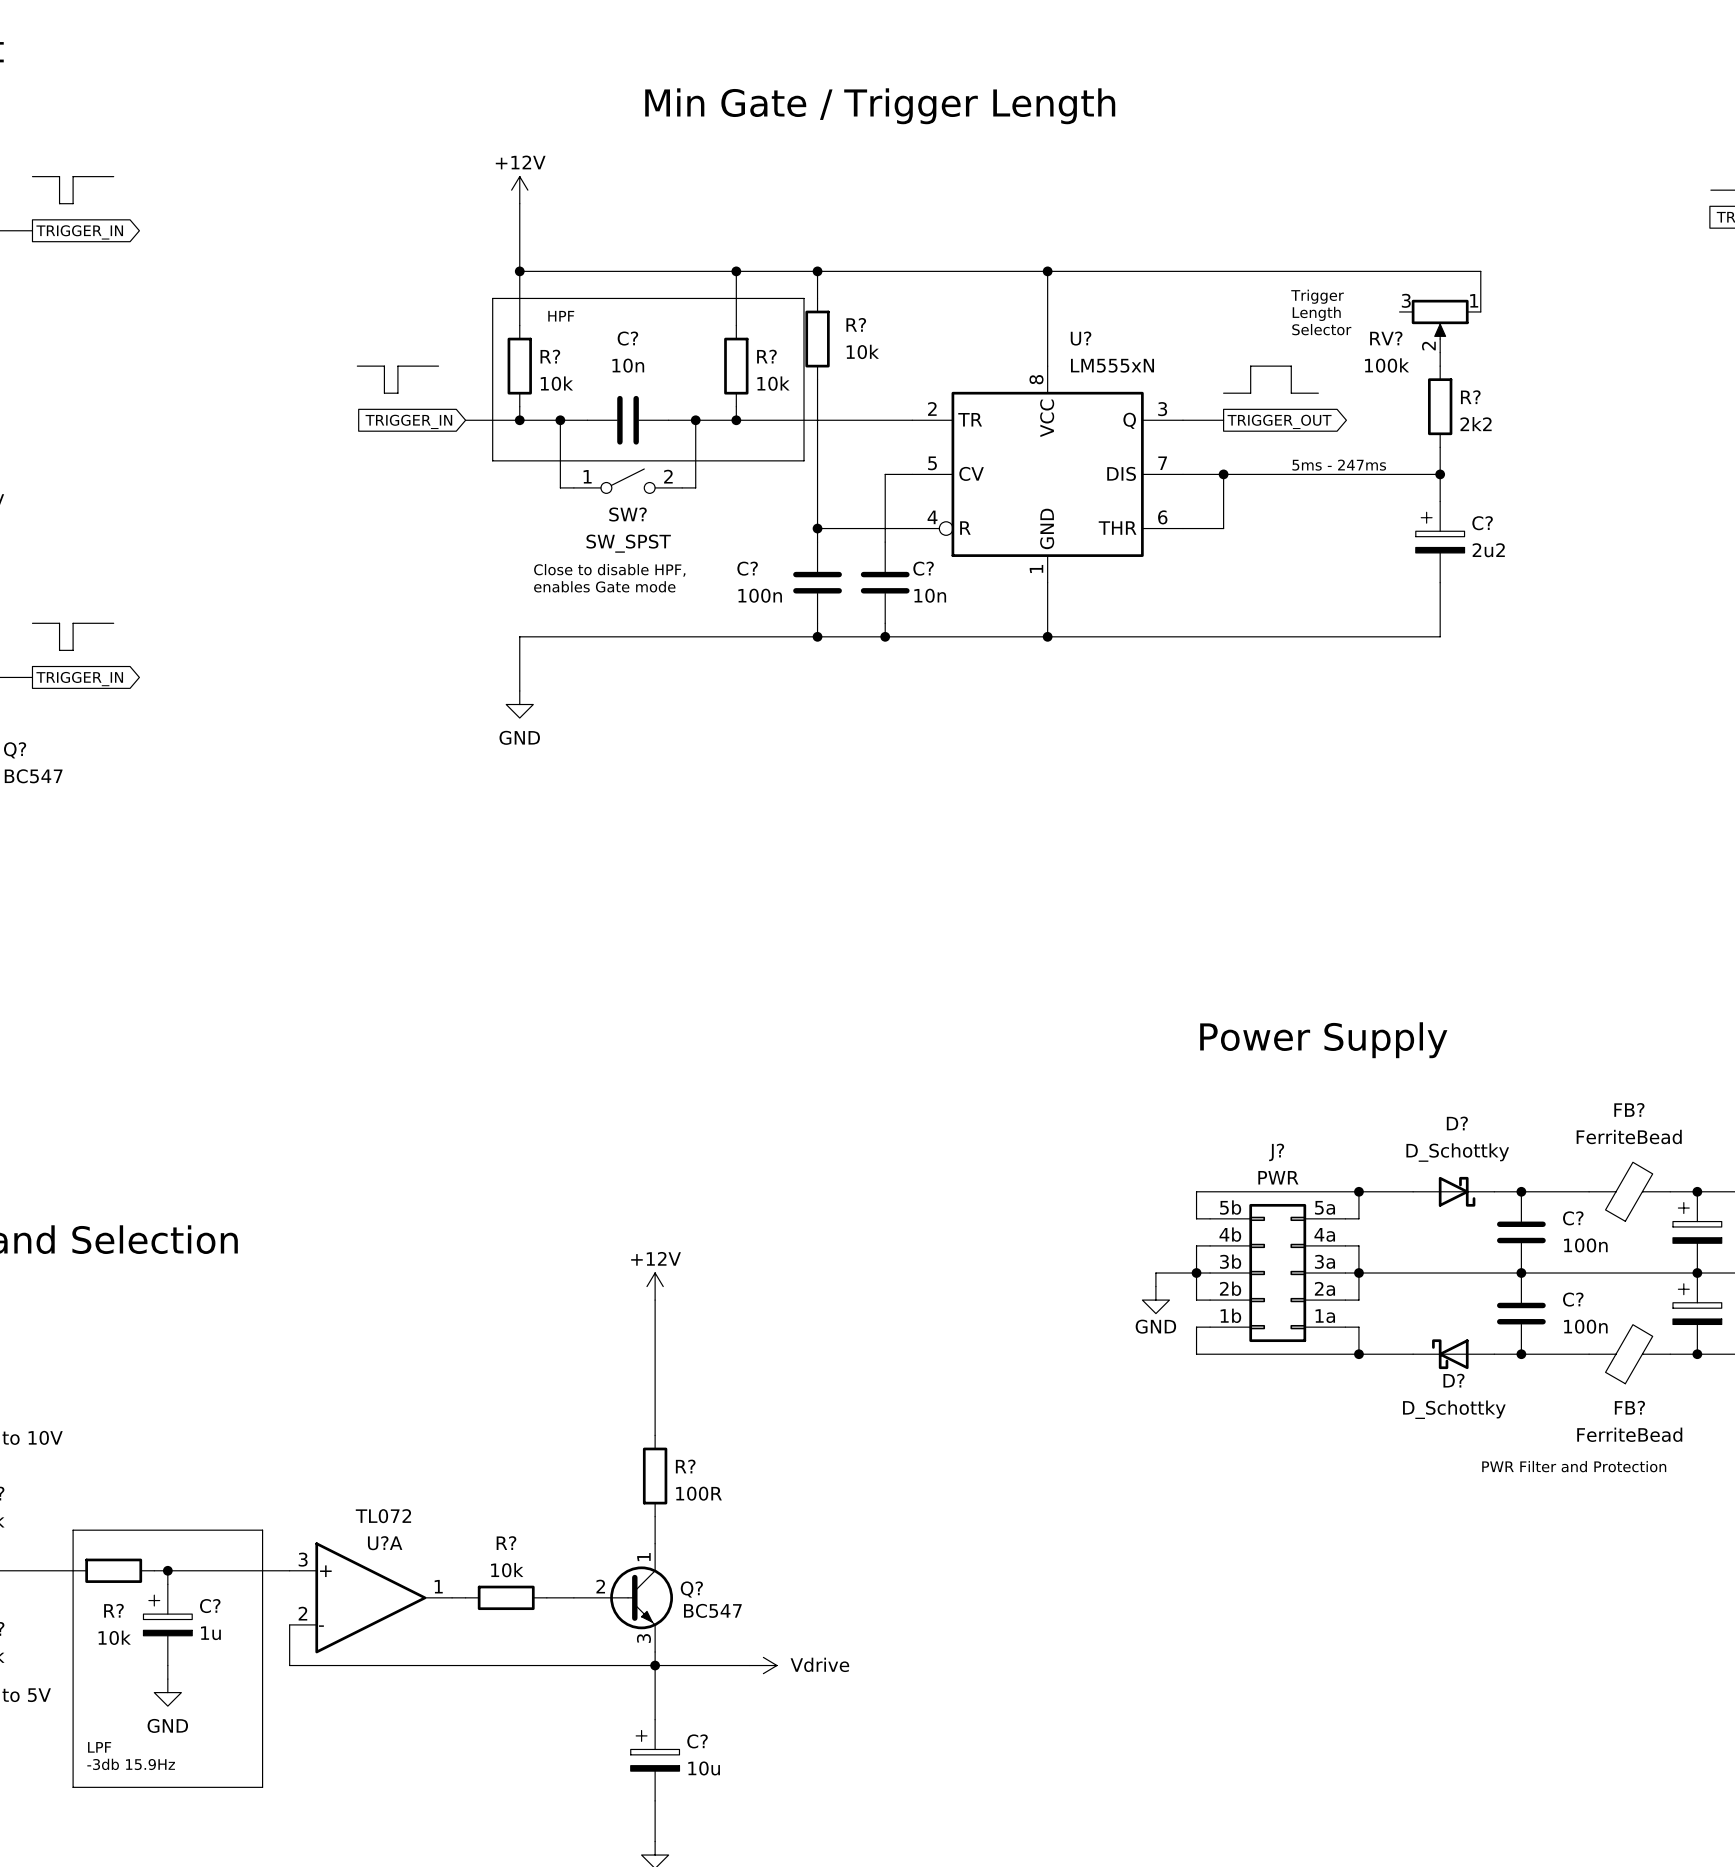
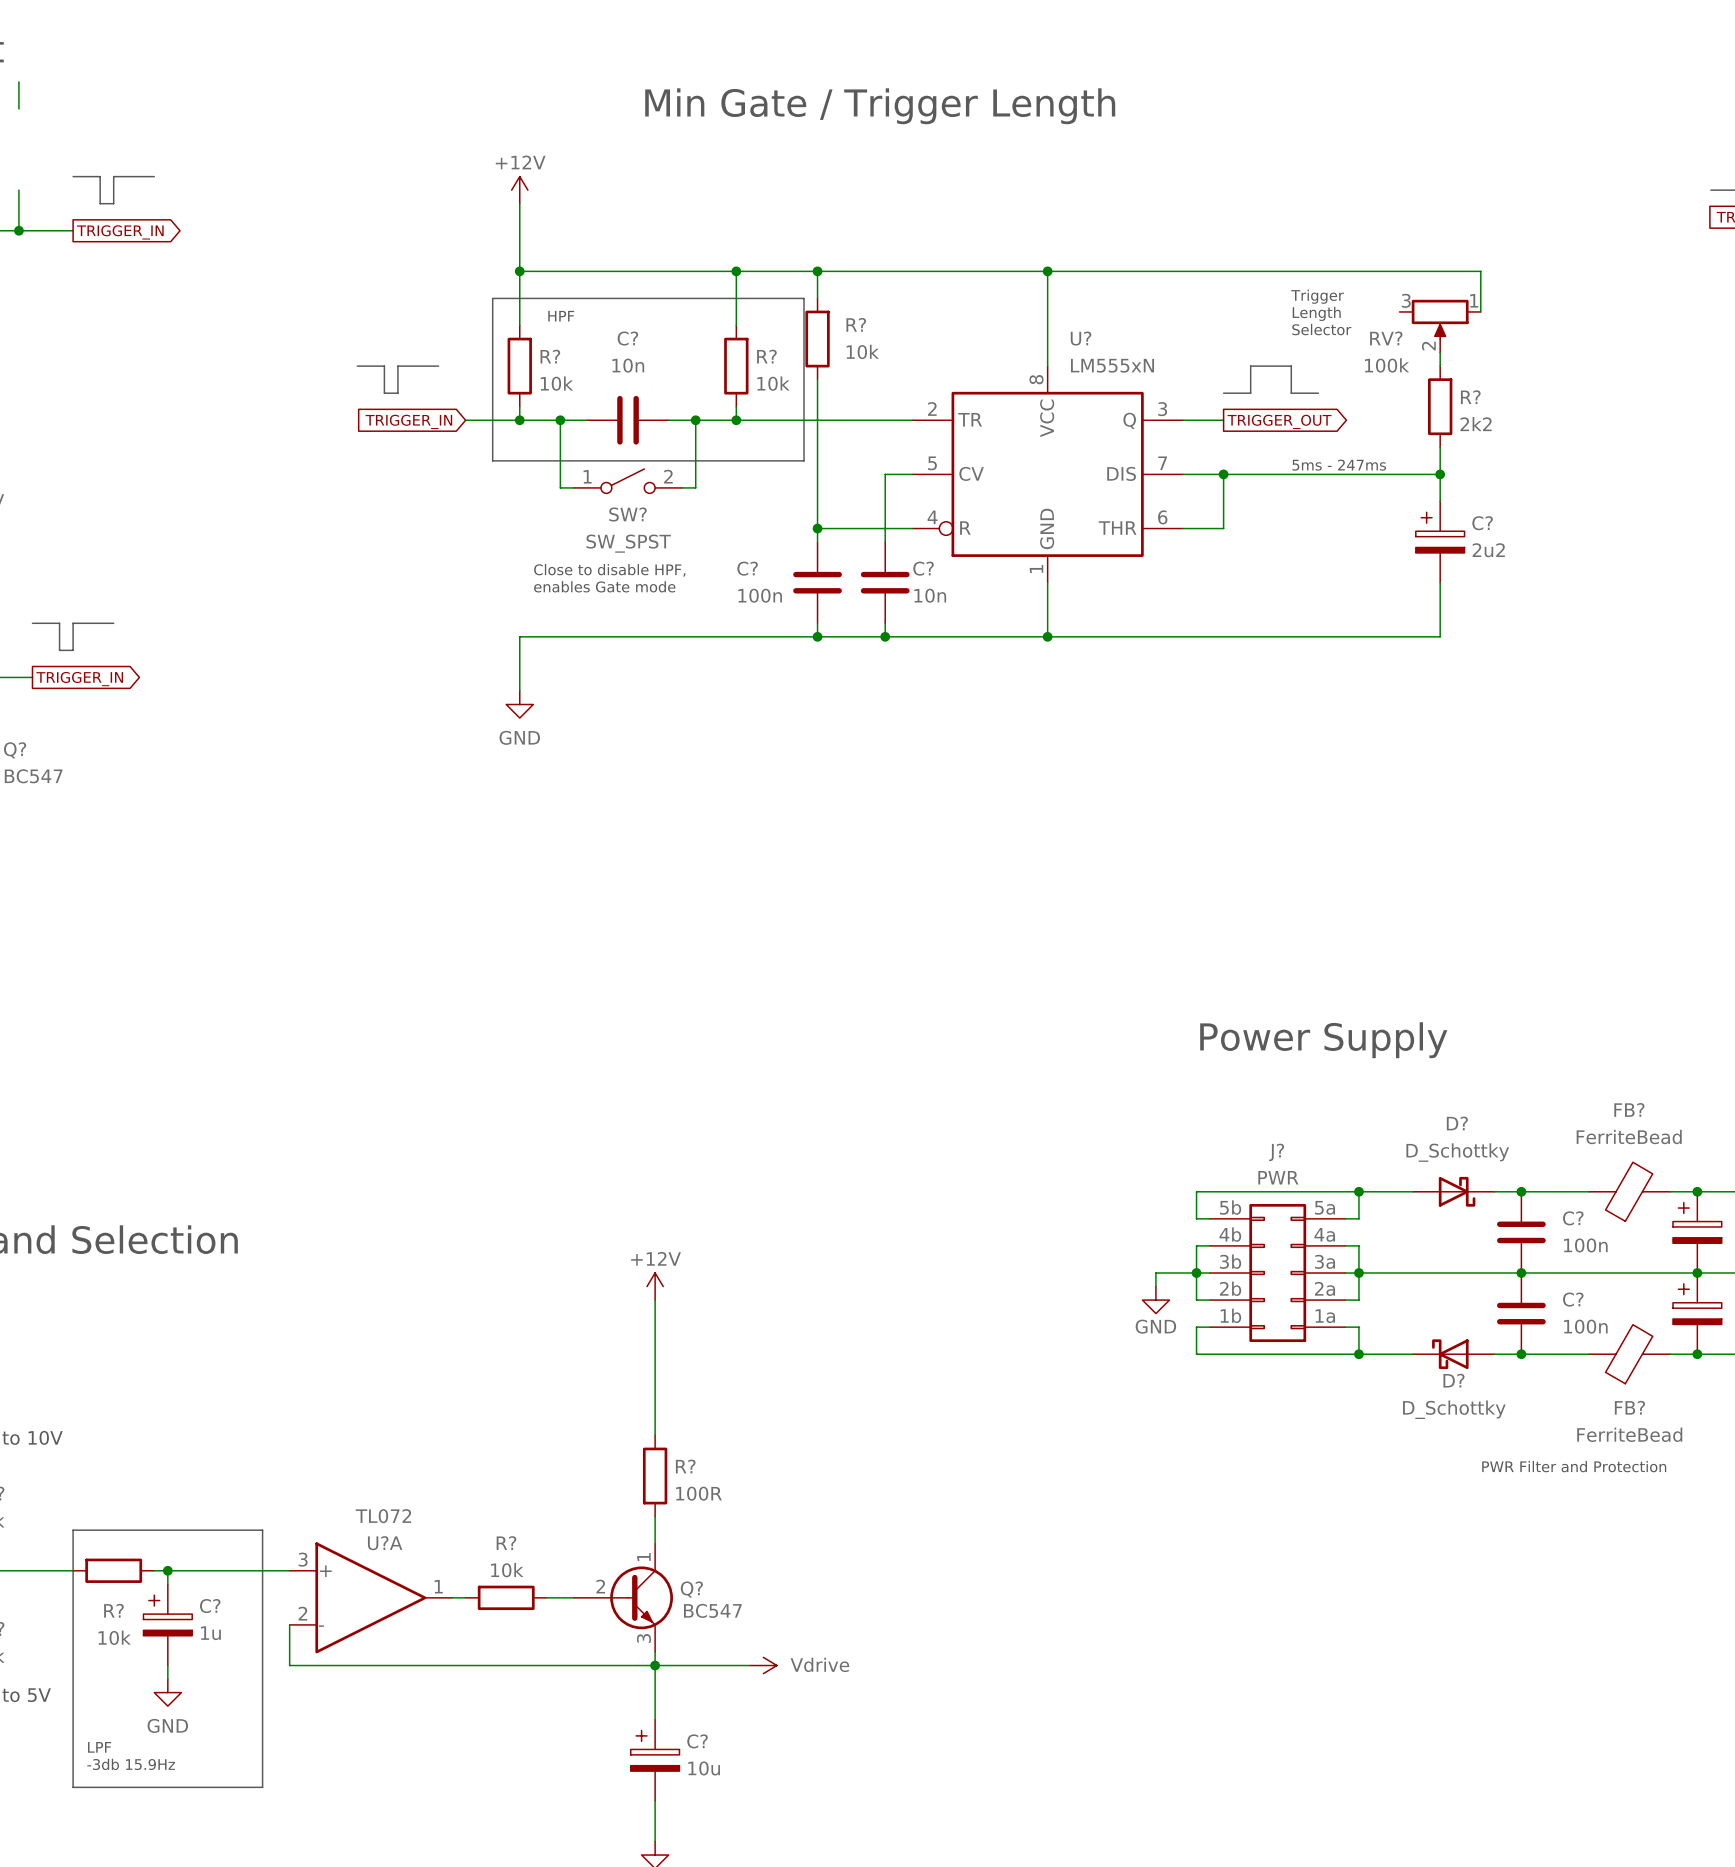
wire: none -> (18, 81) (18, 108)
line: (32, 176) (59, 176) (59, 203) (73, 203) (73, 176) -> none
line: (100, 176) (113, 176) -> (100, 176) (100, 203) (113, 203) (113, 176) (154, 176)
wire: none -> (18, 190) (18, 230)
junction: none -> (18, 230)
wire: none -> (32, 230) (73, 230)
global label position: TRIGGER_IN (79, 232) -> TRIGGER_IN (120, 232)

